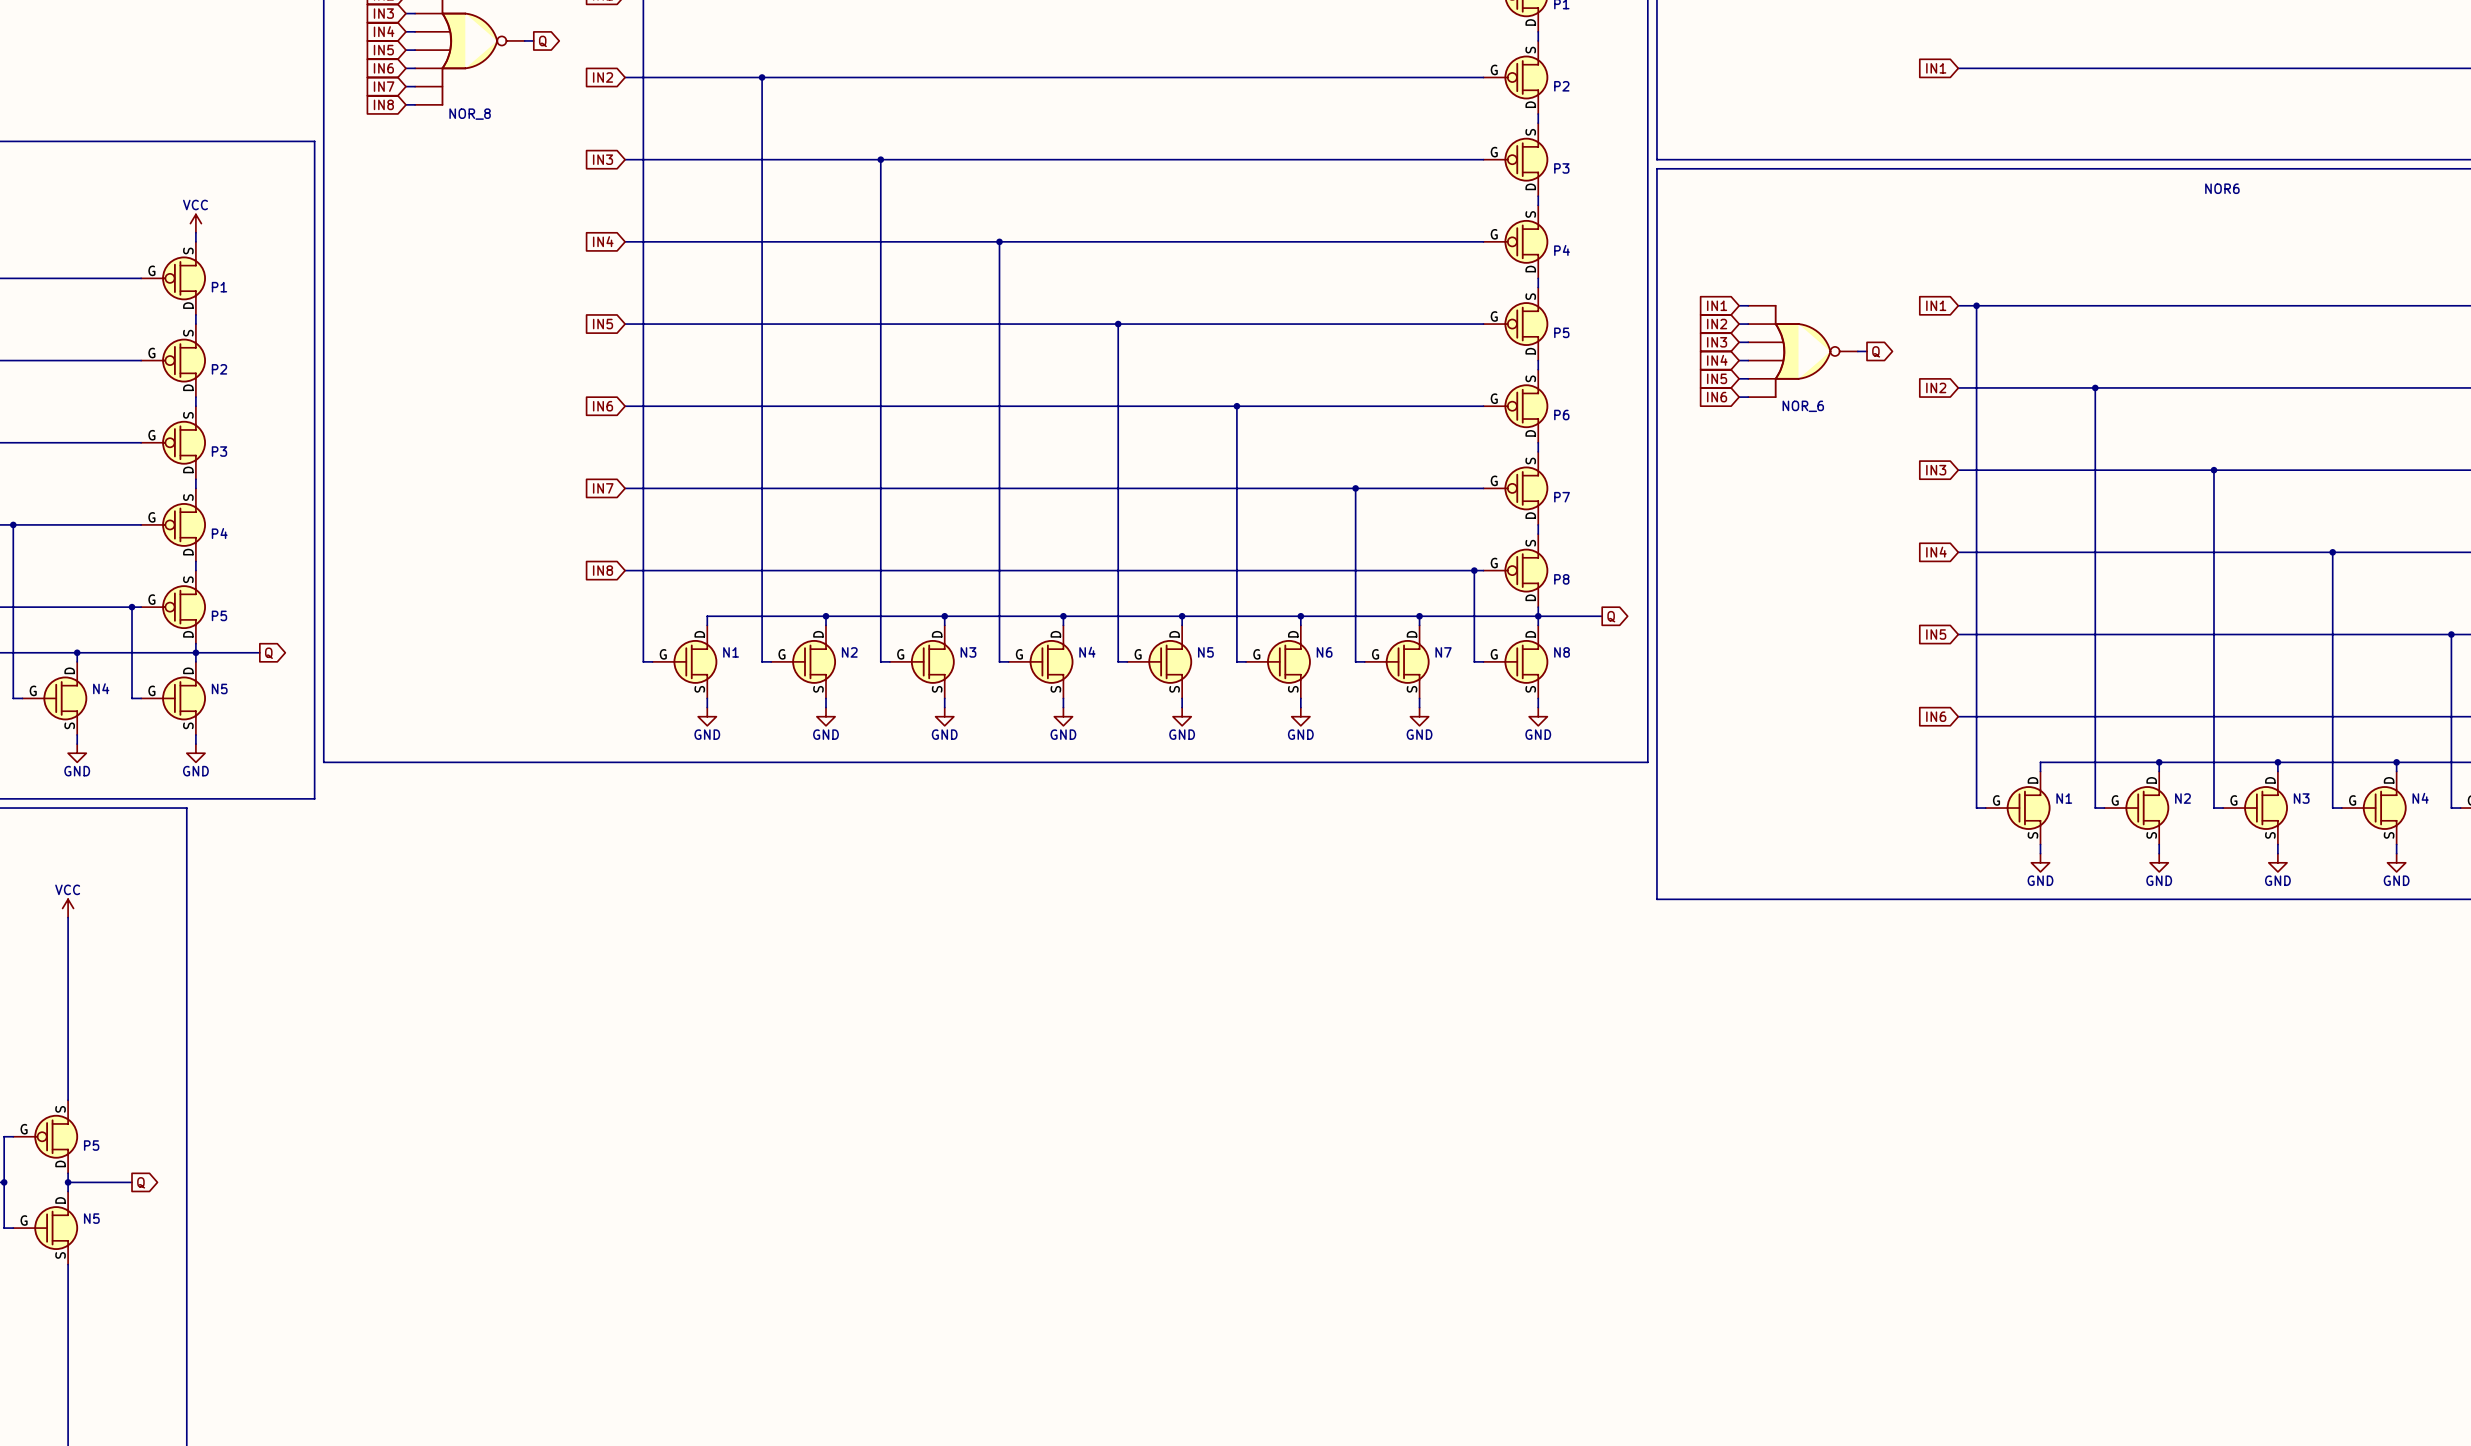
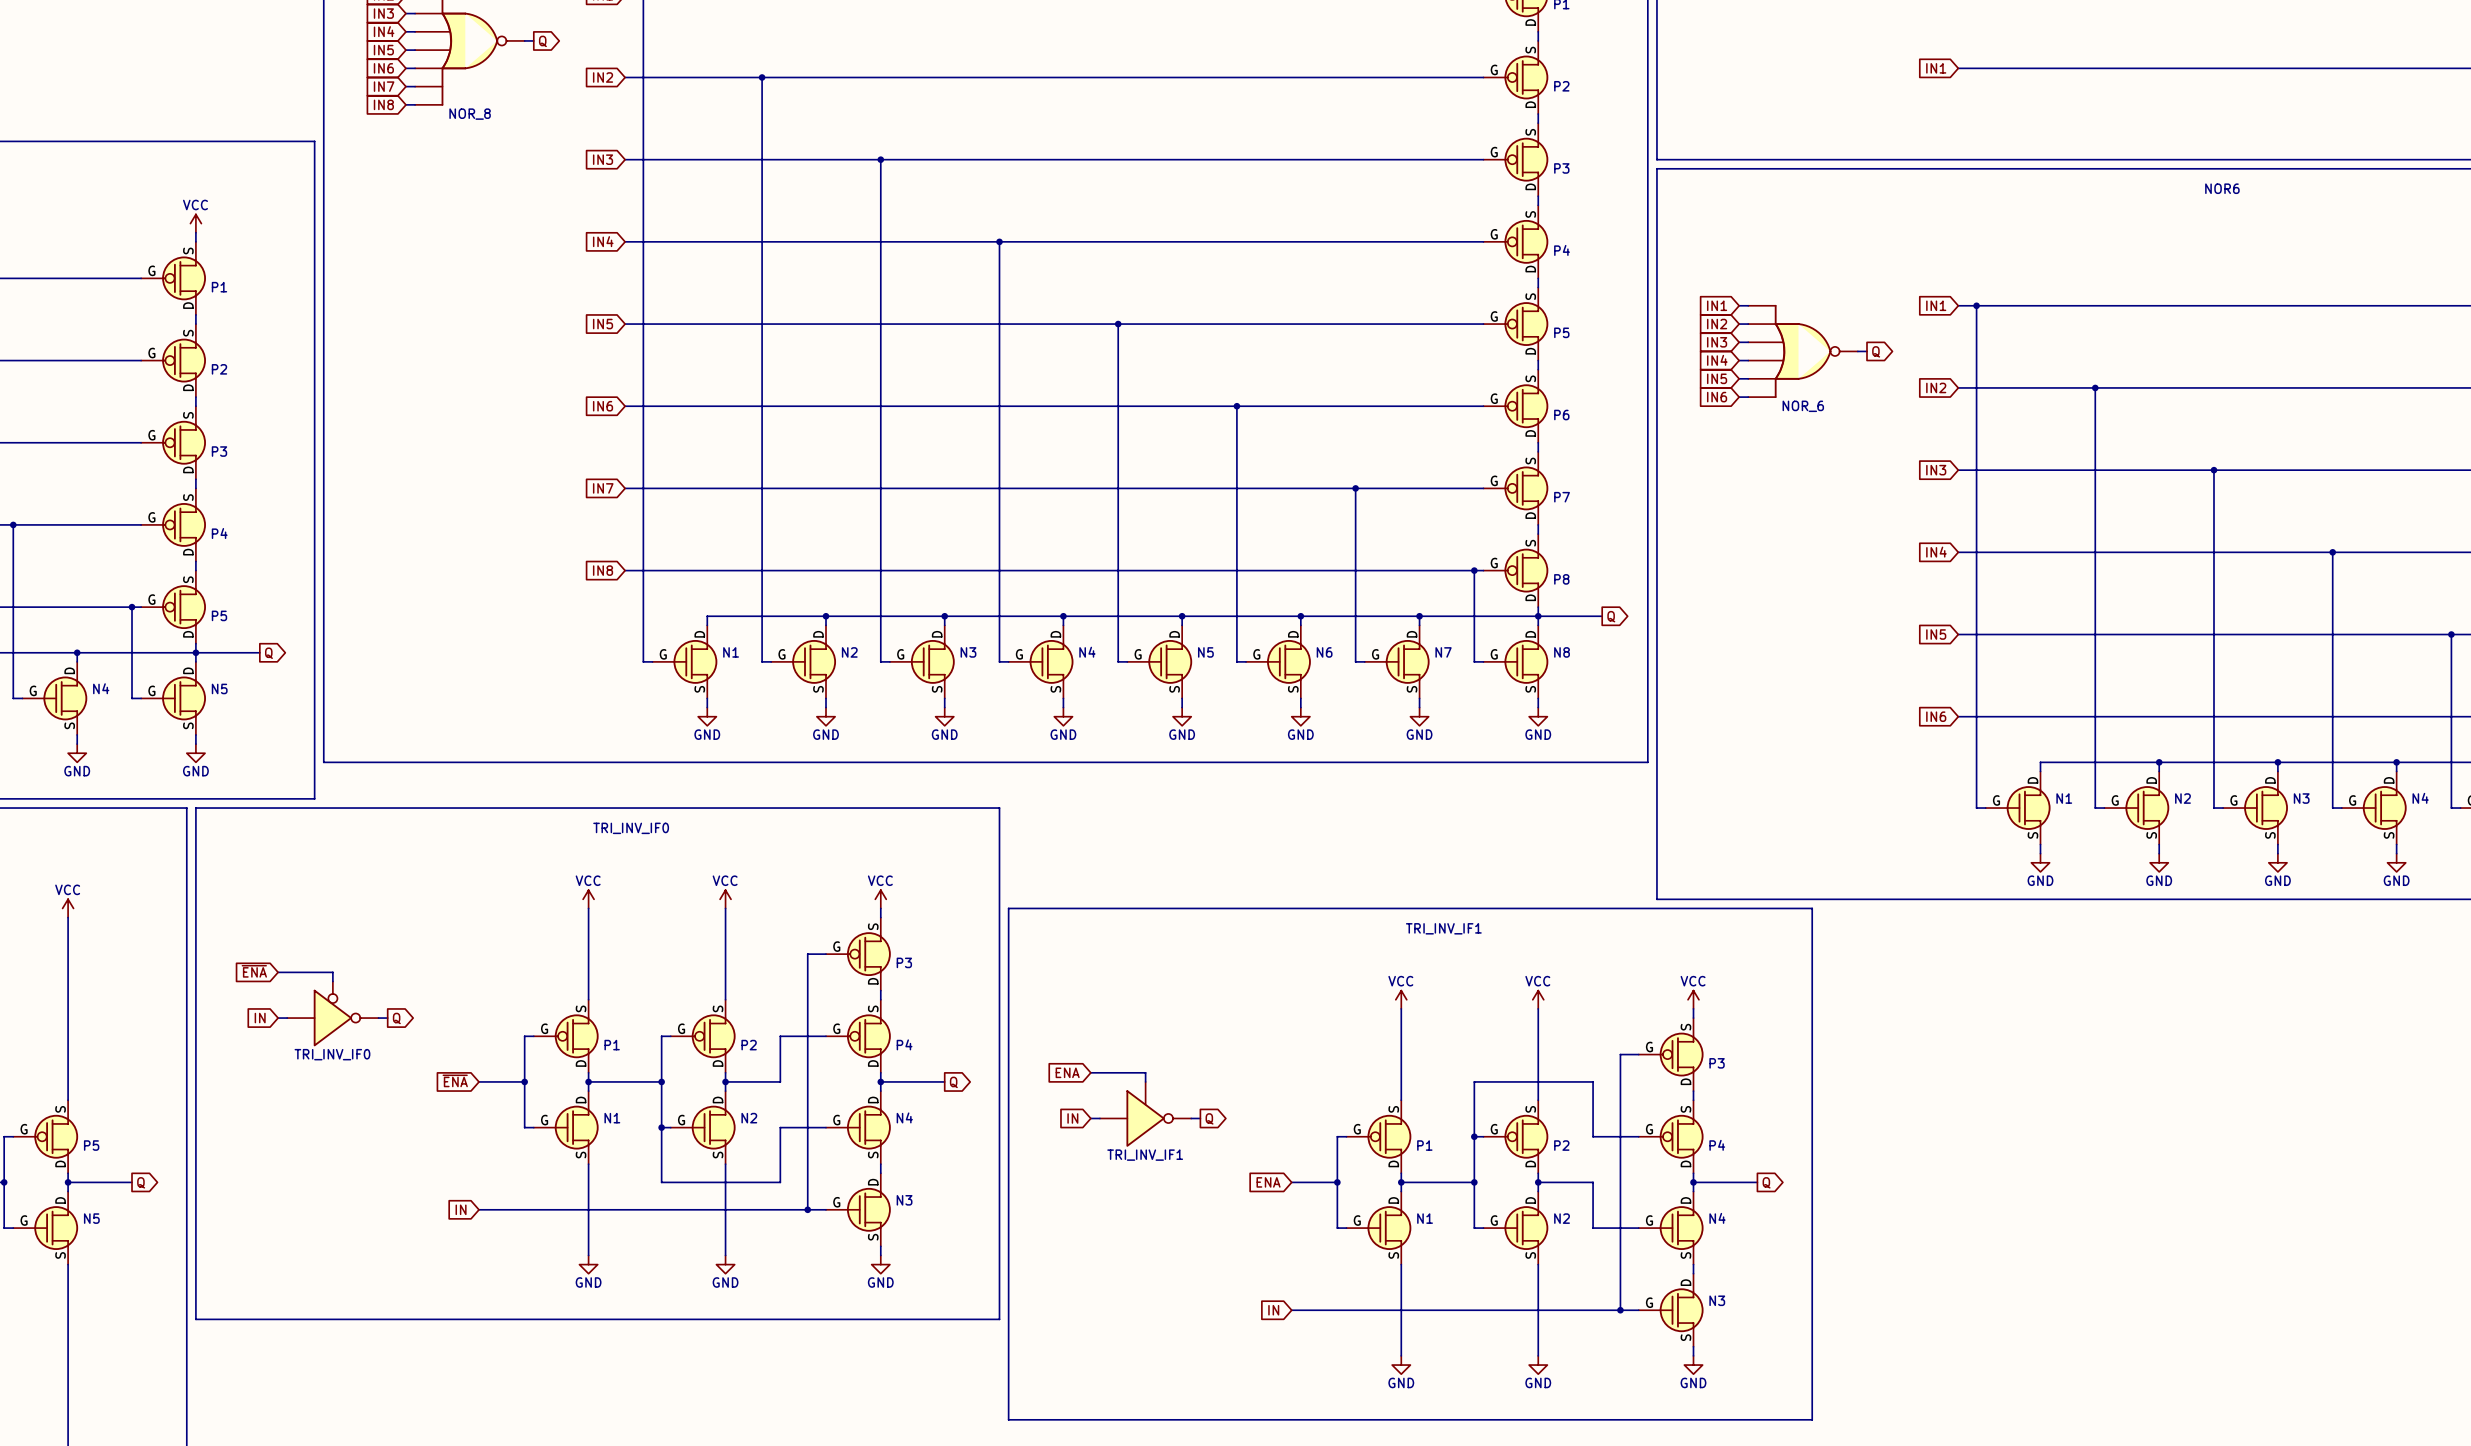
line: none -> (195, 808) (999, 808) (999, 1319) (195, 1319) (195, 808)
text: none -> TRI_INV_IF0 (631, 828)
power symbol: none -> VCC (588, 899)
power symbol: none -> VCC (725, 899)
power symbol: none -> VCC (880, 899)
wire: none -> (588, 908) (588, 999)
wire: none -> (725, 908) (725, 999)
wire: none -> (880, 908) (880, 917)
line: none -> (1008, 908) (1812, 908) (1812, 1419) (1008, 1419) (1008, 908)
text: none -> TRI_INV_IF1 (1443, 928)
wire: none -> (826, 954) (807, 954) (807, 1209)
P3: none -> (858, 954)
global label: none -> ~{ENA} (254, 971)
wire: none -> (278, 972) (332, 972) (332, 981)
wire: none -> (880, 990) (880, 999)
power symbol: none -> VCC (1401, 999)
power symbol: none -> VCC (1538, 999)
power symbol: none -> VCC (1693, 999)
wire: none -> (1401, 1008) (1401, 1100)
wire: none -> (1538, 1008) (1538, 1100)
wire: none -> (1693, 1008) (1693, 1018)
part: none -> TRI_INV_IF0 (332, 1013)
global label: none -> IN (260, 1018)
wire: none -> (278, 1018) (287, 1018)
wire: none -> (378, 1018) (387, 1018)
global label: none -> Q (396, 1018)
wire: none -> (533, 1036) (524, 1036) (524, 1127) (533, 1127)
P1: none -> (566, 1036)
wire: none -> (670, 1036) (661, 1036) (661, 1182) (780, 1182) (780, 1127) (826, 1127)
P2: none -> (703, 1036)
wire: none -> (826, 1036) (780, 1036) (780, 1081) (725, 1081)
P4: none -> (858, 1036)
wire: none -> (1638, 1054) (1620, 1054) (1620, 1310)
P3: none -> (1671, 1054)
wire: none -> (588, 1072) (588, 1091)
wire: none -> (725, 1072) (725, 1091)
wire: none -> (880, 1072) (880, 1091)
global label: none -> ENA (1067, 1072)
wire: none -> (1090, 1072) (1145, 1072) (1145, 1081)
global label: none -> ~{ENA} (455, 1080)
wire: none -> (479, 1081) (524, 1081)
junction: none -> (524, 1081)
wire: none -> (588, 1081) (661, 1081)
junction: none -> (588, 1081)
junction: none -> (661, 1081)
junction: none -> (725, 1081)
wire: none -> (880, 1081) (944, 1081)
junction: none -> (880, 1081)
global label: none -> Q (953, 1082)
wire: none -> (1693, 1091) (1693, 1100)
part: none -> TRI_INV_IF1 (1145, 1114)
global label: none -> IN (1072, 1118)
wire: none -> (1090, 1118) (1099, 1118)
wire: none -> (1191, 1118) (1200, 1118)
global label: none -> Q (1209, 1118)
N1: none -> (566, 1127)
wire: none -> (661, 1127) (670, 1127)
junction: none -> (661, 1127)
N2: none -> (703, 1127)
N4: none -> (858, 1127)
wire: none -> (1346, 1136) (1337, 1136) (1337, 1228) (1346, 1228)
P1: none -> (1378, 1136)
wire: none -> (1474, 1136) (1483, 1136)
junction: none -> (1474, 1136)
P2: none -> (1515, 1136)
wire: none -> (1638, 1136) (1593, 1136) (1593, 1081) (1474, 1081) (1474, 1228) (1483, 1228)
P4: none -> (1671, 1136)
wire: none -> (588, 1164) (588, 1255)
wire: none -> (725, 1164) (725, 1255)
wire: none -> (880, 1164) (880, 1173)
wire: none -> (1401, 1173) (1401, 1191)
wire: none -> (1538, 1173) (1538, 1191)
wire: none -> (1693, 1173) (1693, 1191)
global label: none -> ENA (1268, 1182)
wire: none -> (1291, 1182) (1337, 1182)
junction: none -> (1337, 1182)
wire: none -> (1401, 1182) (1474, 1182)
junction: none -> (1401, 1182)
junction: none -> (1474, 1182)
wire: none -> (1538, 1182) (1593, 1182) (1593, 1228) (1638, 1228)
junction: none -> (1538, 1182)
wire: none -> (1693, 1182) (1757, 1182)
junction: none -> (1693, 1182)
global label: none -> Q (1766, 1182)
global label: none -> IN (461, 1209)
wire: none -> (479, 1209) (826, 1209)
junction: none -> (807, 1209)
N3: none -> (858, 1209)
N1: none -> (1378, 1228)
N2: none -> (1515, 1228)
N4: none -> (1671, 1228)
wire: none -> (880, 1246) (880, 1255)
power symbol: none -> GND (588, 1264)
power symbol: none -> GND (725, 1264)
power symbol: none -> GND (880, 1264)
wire: none -> (1401, 1264) (1401, 1355)
wire: none -> (1538, 1264) (1538, 1355)
wire: none -> (1693, 1264) (1693, 1273)
global label: none -> IN (1273, 1310)
wire: none -> (1291, 1310) (1638, 1310)
junction: none -> (1620, 1310)
N3: none -> (1671, 1310)
wire: none -> (1693, 1346) (1693, 1355)
power symbol: none -> GND (1401, 1365)
power symbol: none -> GND (1538, 1365)
power symbol: none -> GND (1693, 1365)

